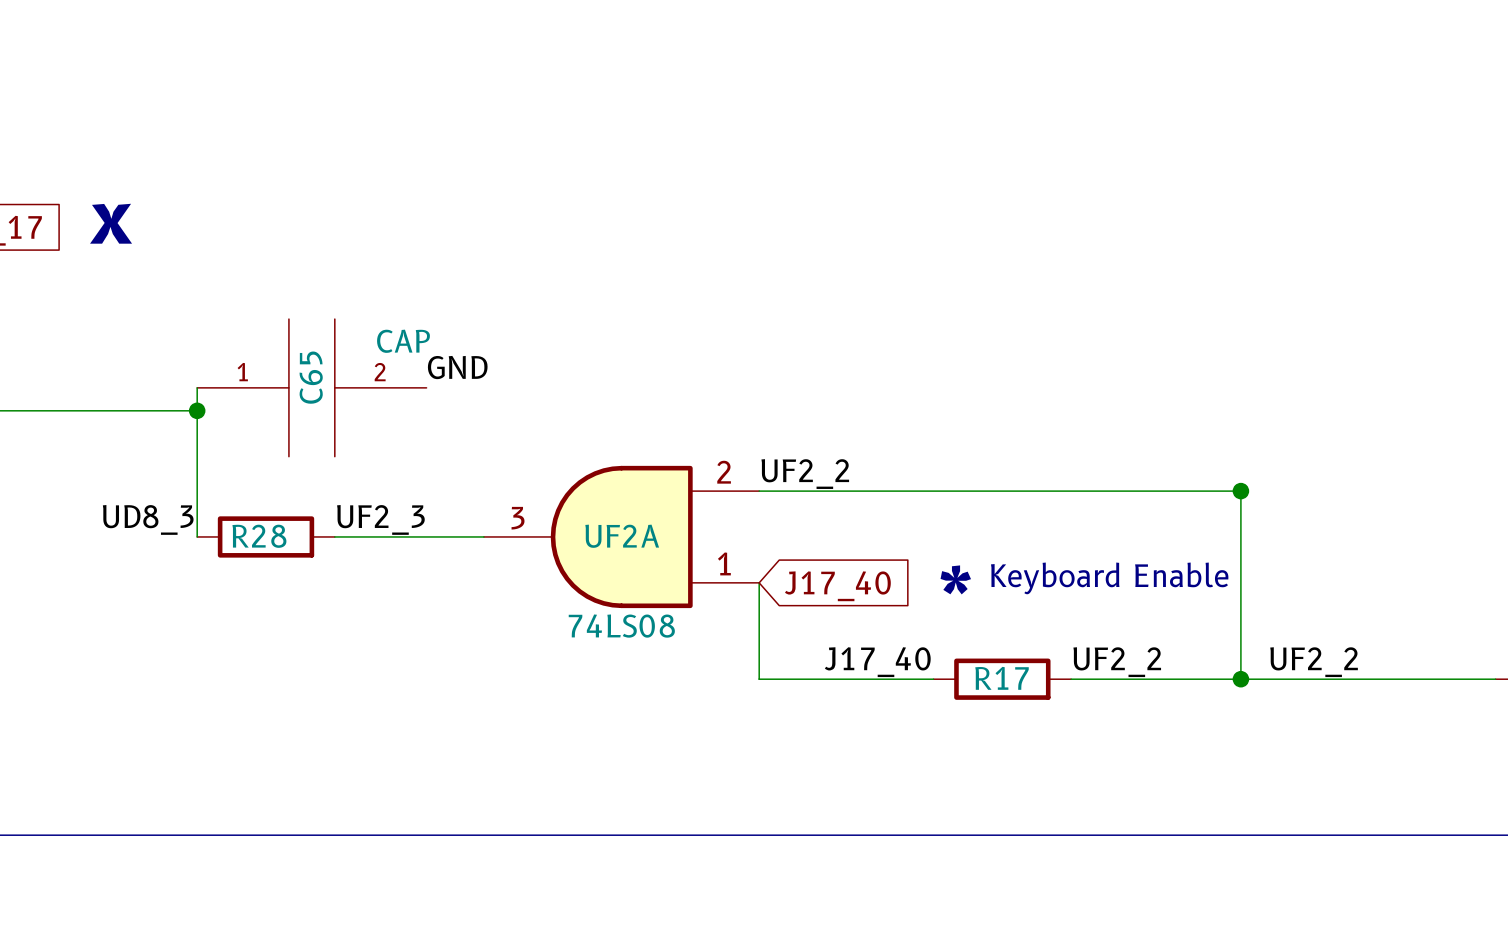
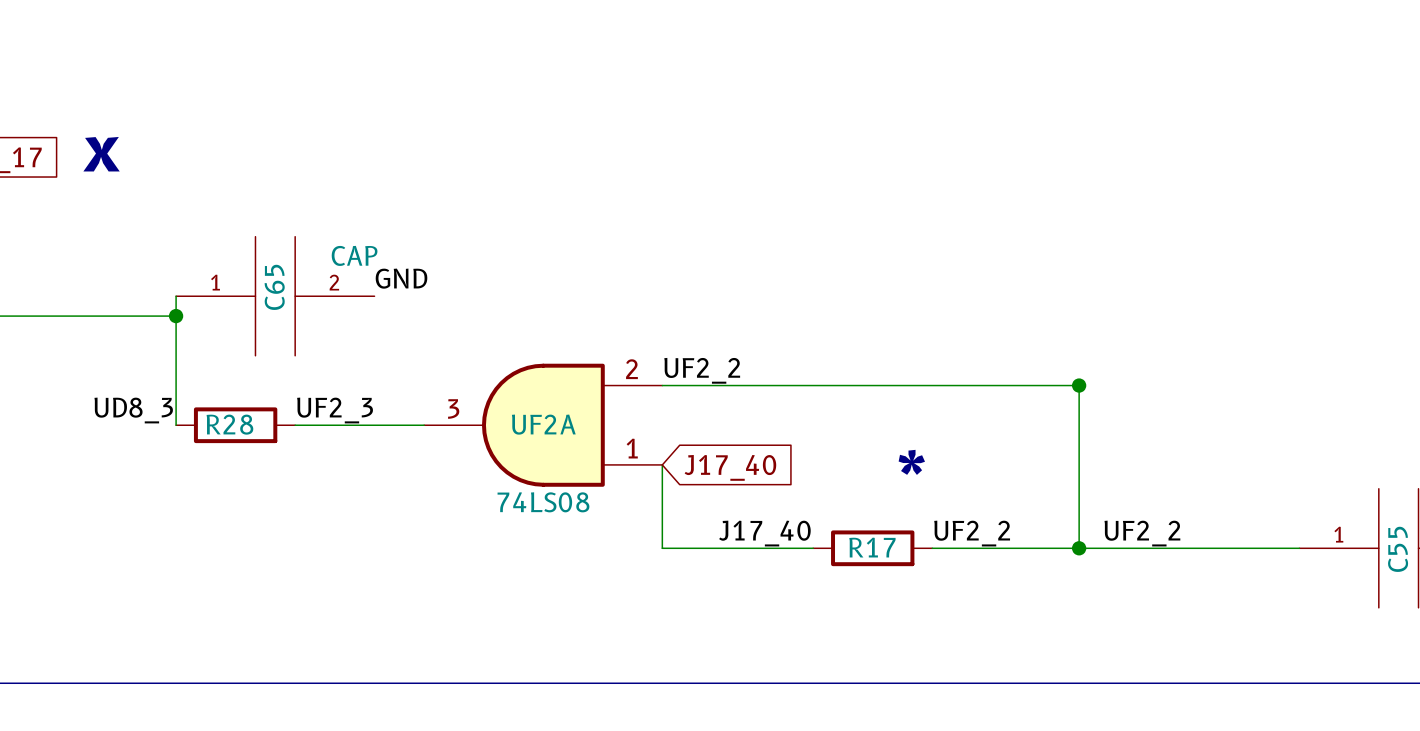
text: Keyboard Enable (1109, 578) -> none
text position: * (955, 579) -> * (911, 462)

